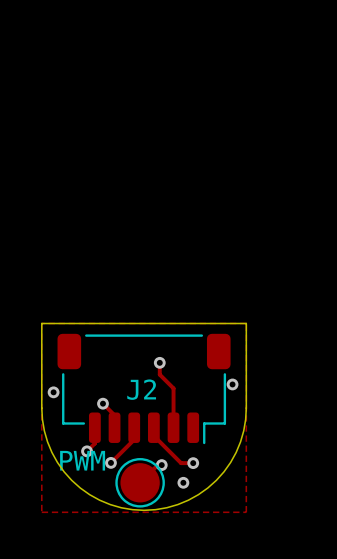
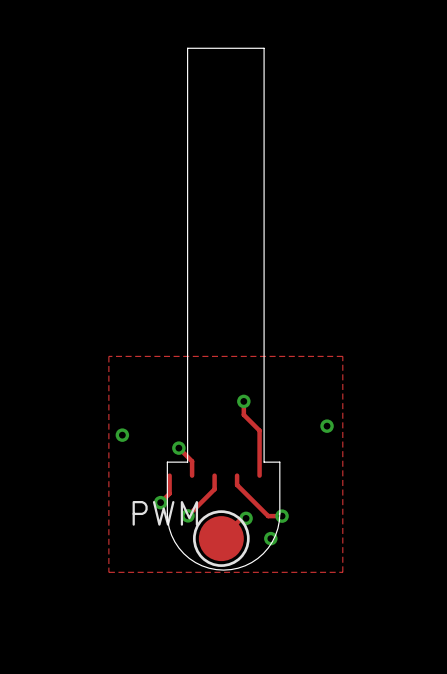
board edge: none -> (187, 48) (264, 48) (264, 462) (279, 462) (279, 513) (275, 535) (263, 553) (245, 565) (230, 569) (209, 568) (189, 558) (174, 541) (167, 521) (167, 462) (187, 462) (187, 48)
board edge: (41, 323) (41, 408) (44, 430) (57, 462) (80, 488) (110, 504) (132, 509) (155, 509) (177, 504) (198, 494) (224, 471) (240, 441) (245, 419) (246, 323) (41, 323) -> none
J2: (144, 388) -> none

